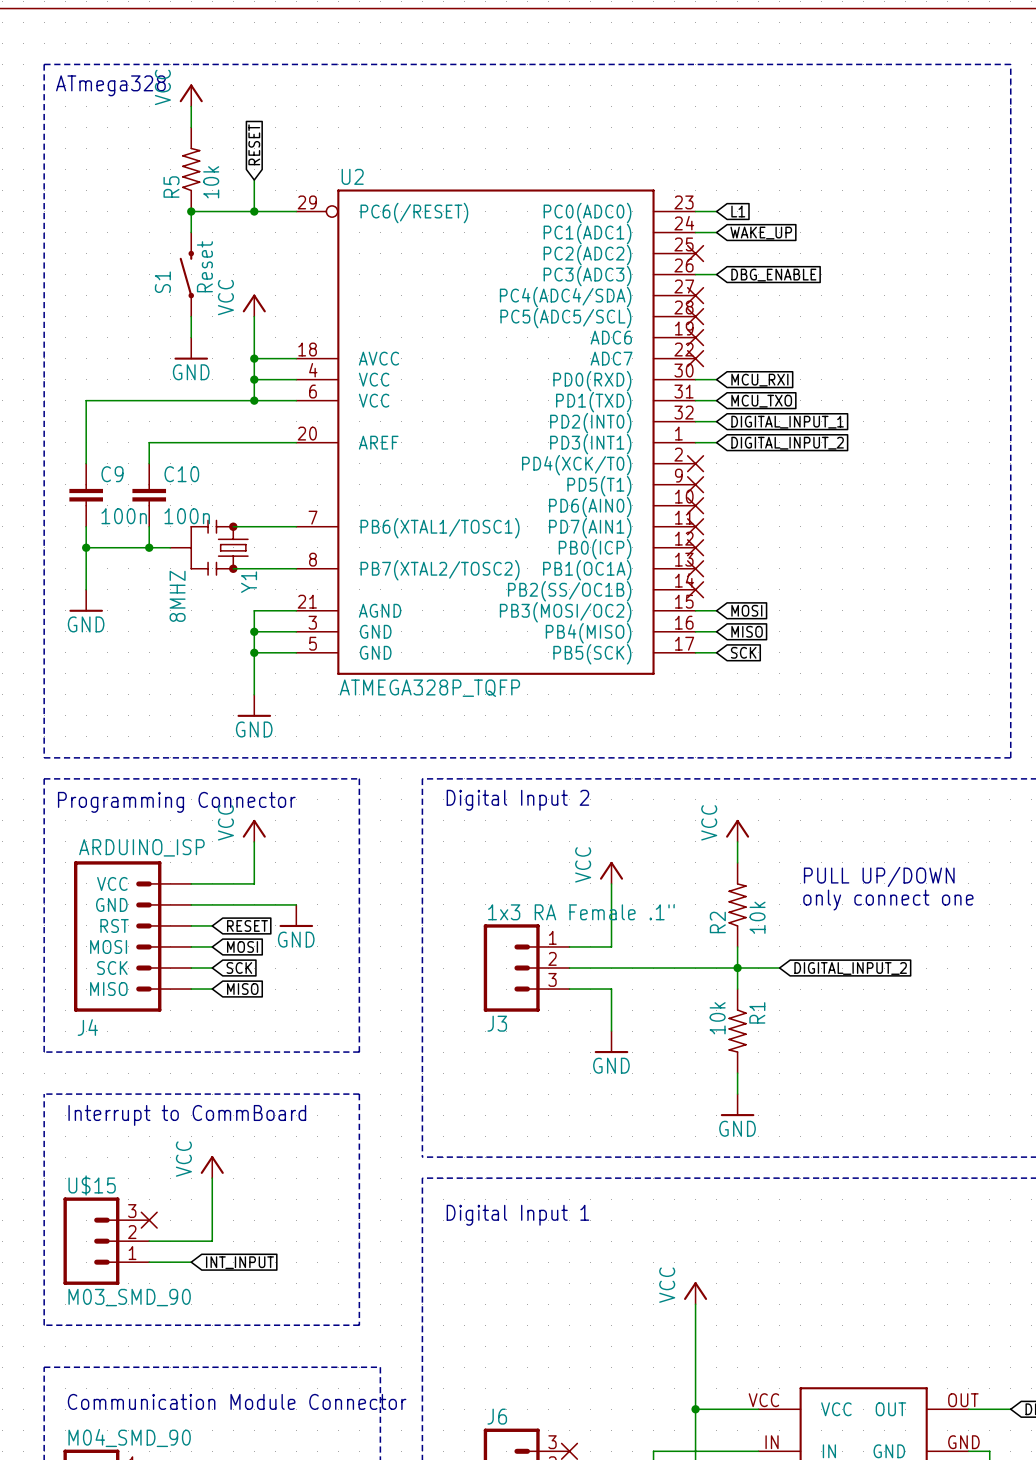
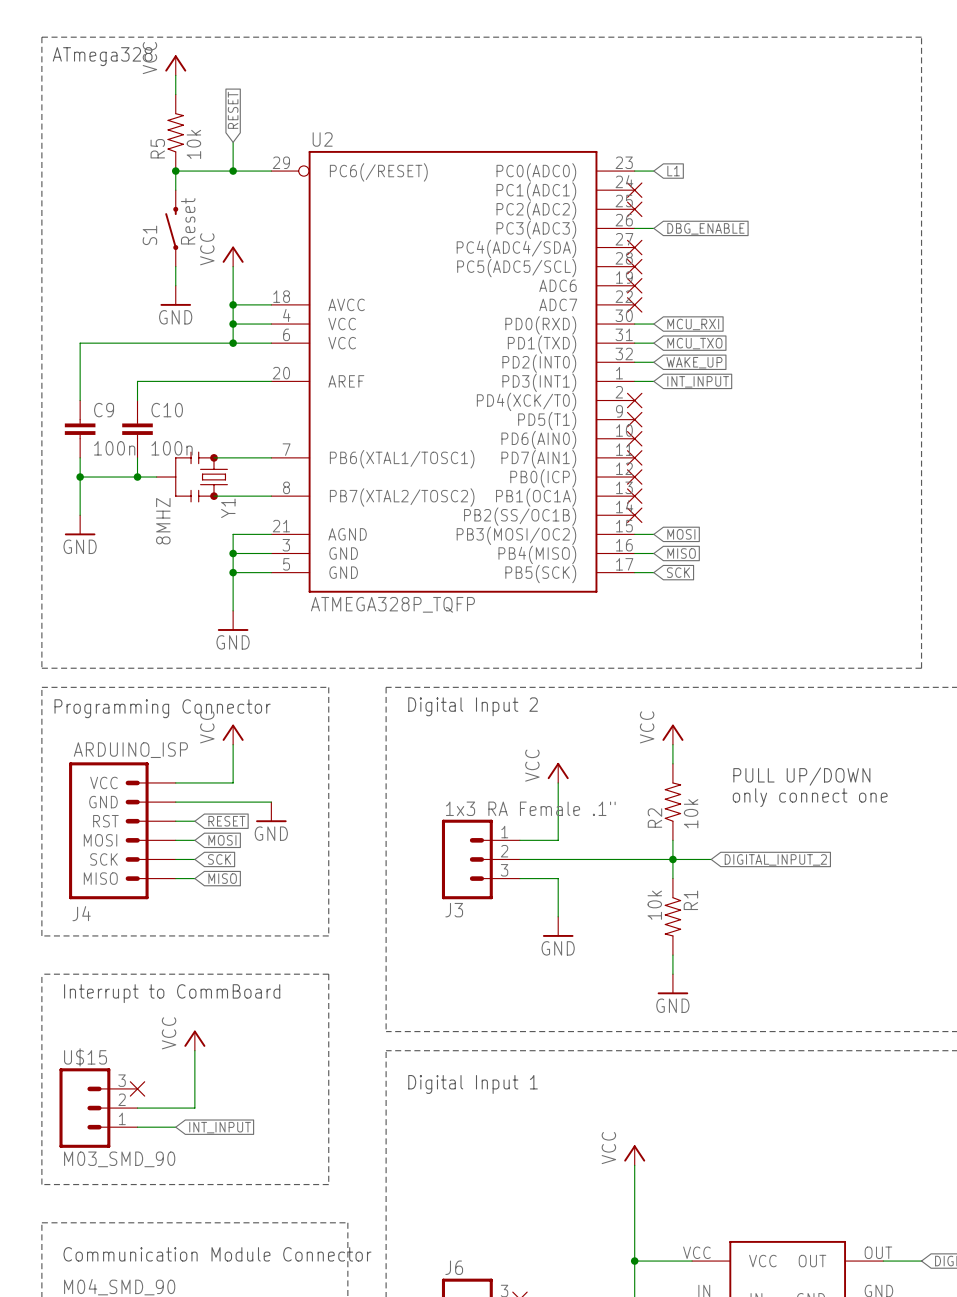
wire: (695, 232) (716, 232) -> none
part: none -> (634, 190)
global label: WAKE_UP (761, 233) -> none
global label: DIGITAL_INPUT_1 (787, 422) -> WAKE_UP (694, 362)
global label: DIGITAL_INPUT_2 (787, 443) -> INT_INPUT (698, 381)

